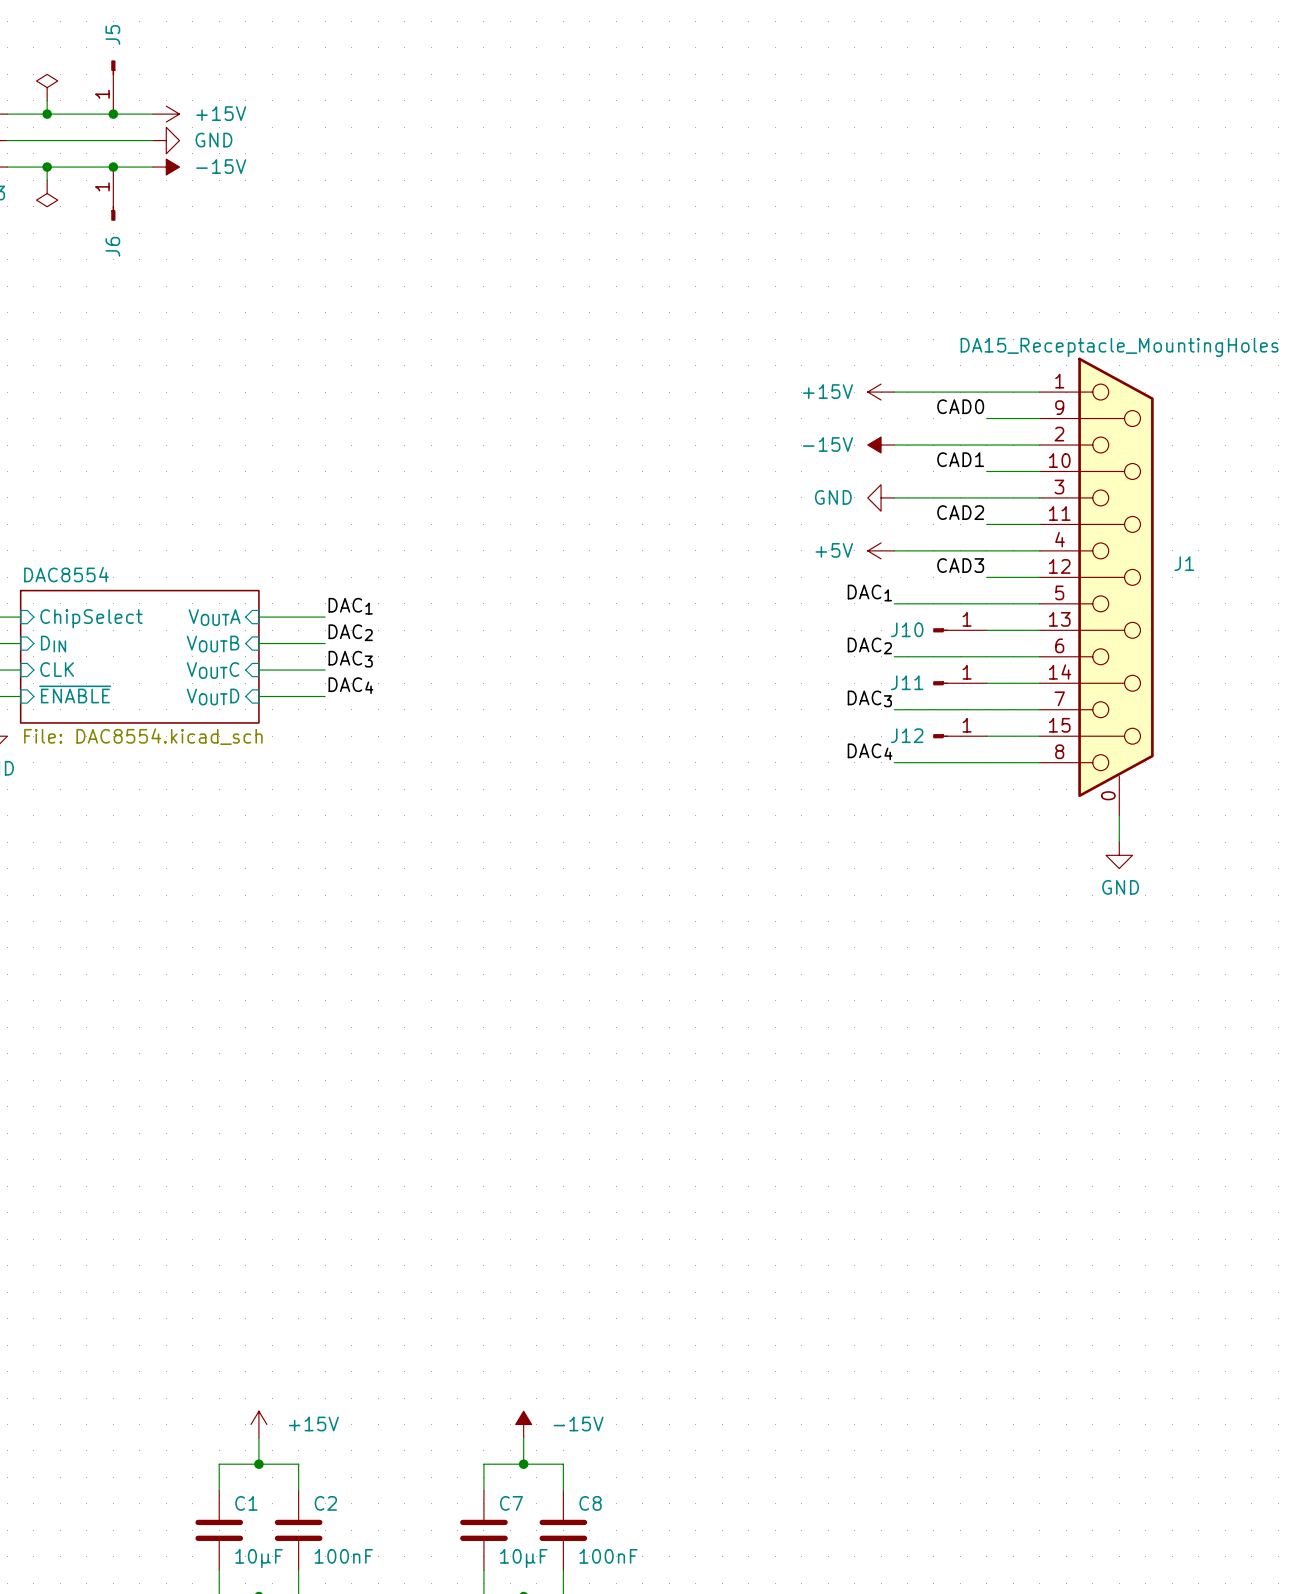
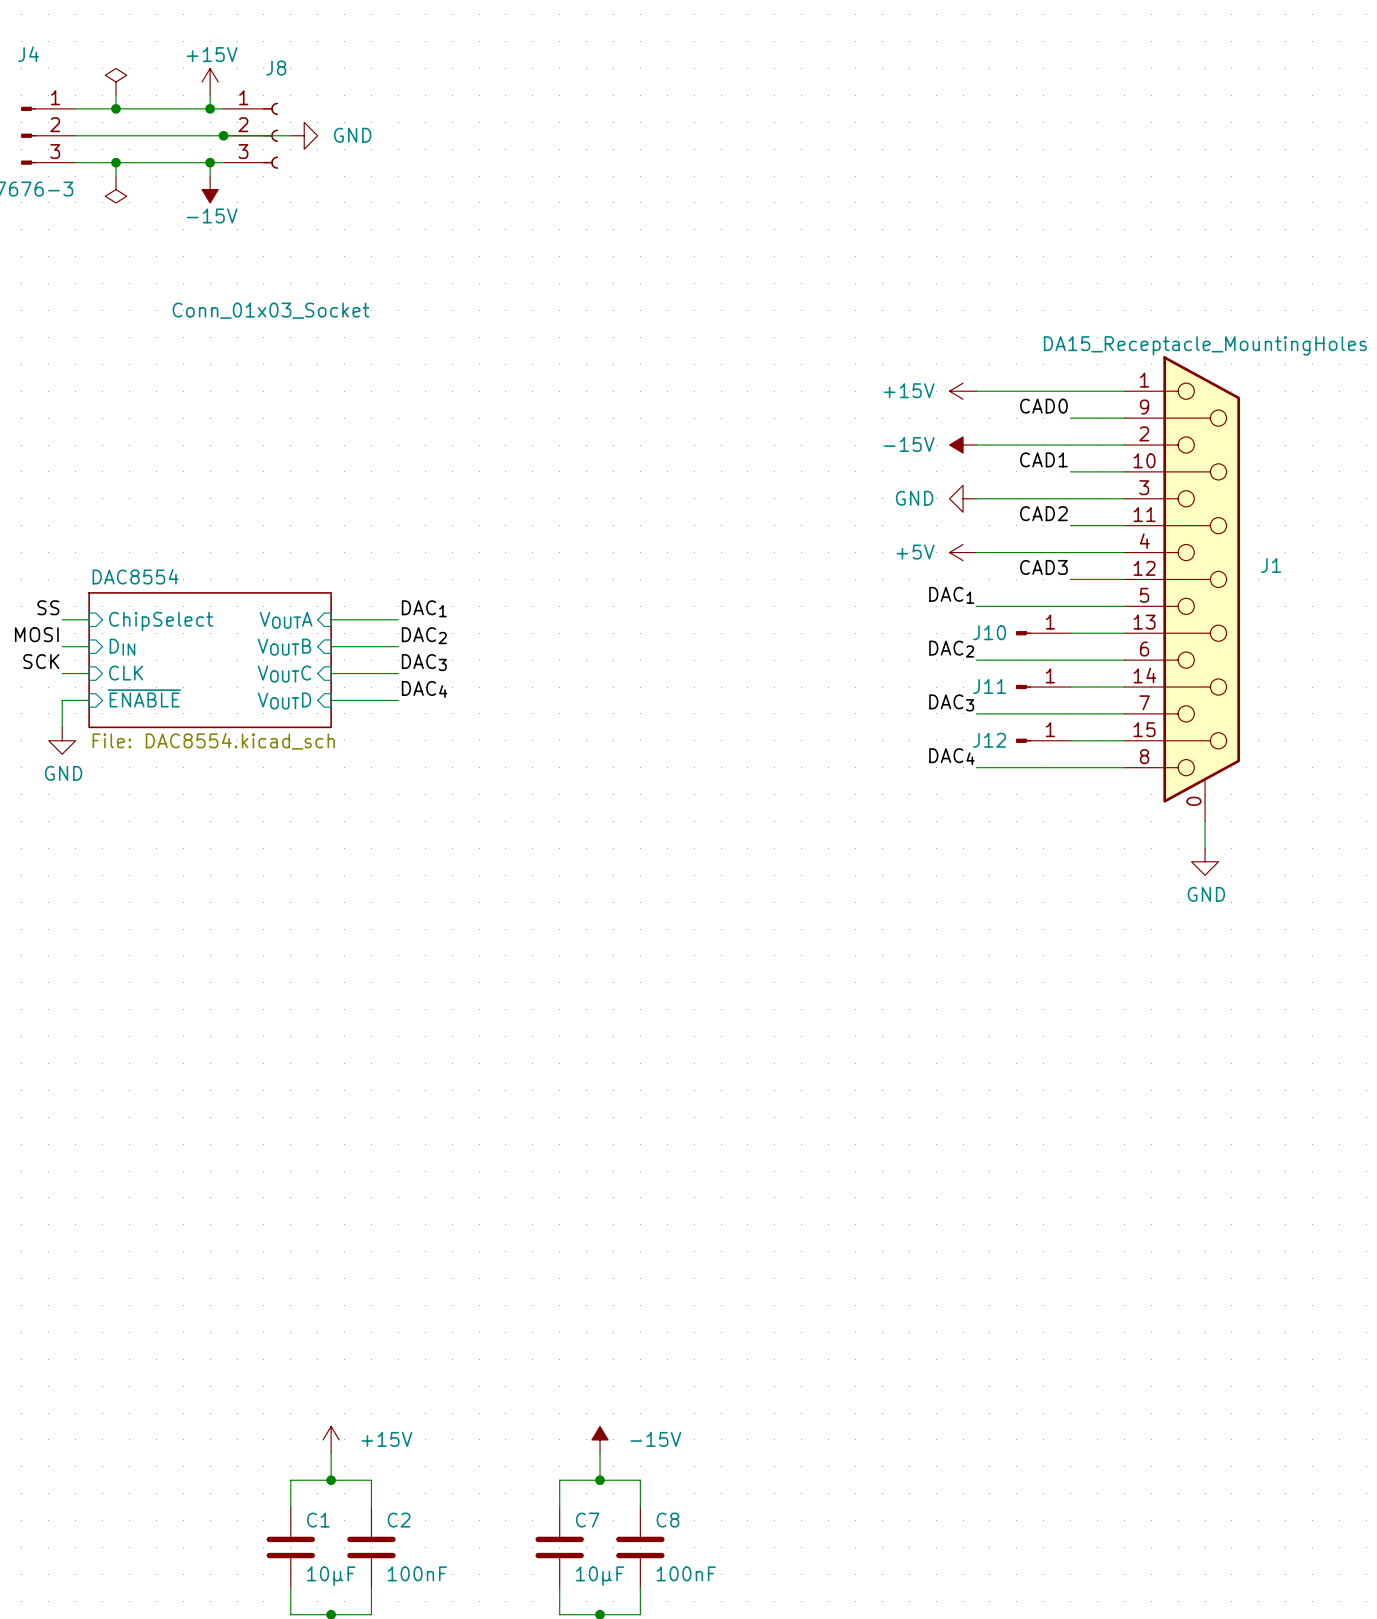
J5: (113, 87) -> none
wire: none -> (210, 95) (210, 108)
power symbol text position: +15V (221, 113) -> +15V (212, 54)
junction: (113, 114) -> none
junction: none -> (210, 108)
power symbol rotation: 0° (166, 114) -> 90° counterclockwise (210, 81)
power symbol position: +15V (166, 114) -> +15V (210, 81)
wire: none -> (223, 135) (290, 135)
junction: none -> (223, 135)
power symbol position: GND (166, 140) -> GND (304, 135)
J8: none -> Conn_01x03_Socket (250, 135)
power symbol text position: -15V (221, 166) -> -15V (212, 215)
junction: (113, 167) -> none
wire: none -> (210, 162) (210, 176)
junction: none -> (210, 162)
power symbol rotation: 0° (166, 167) -> 90° clockwise (210, 189)
power symbol position: -15V (166, 167) -> -15V (210, 189)
J6: (113, 193) -> none

